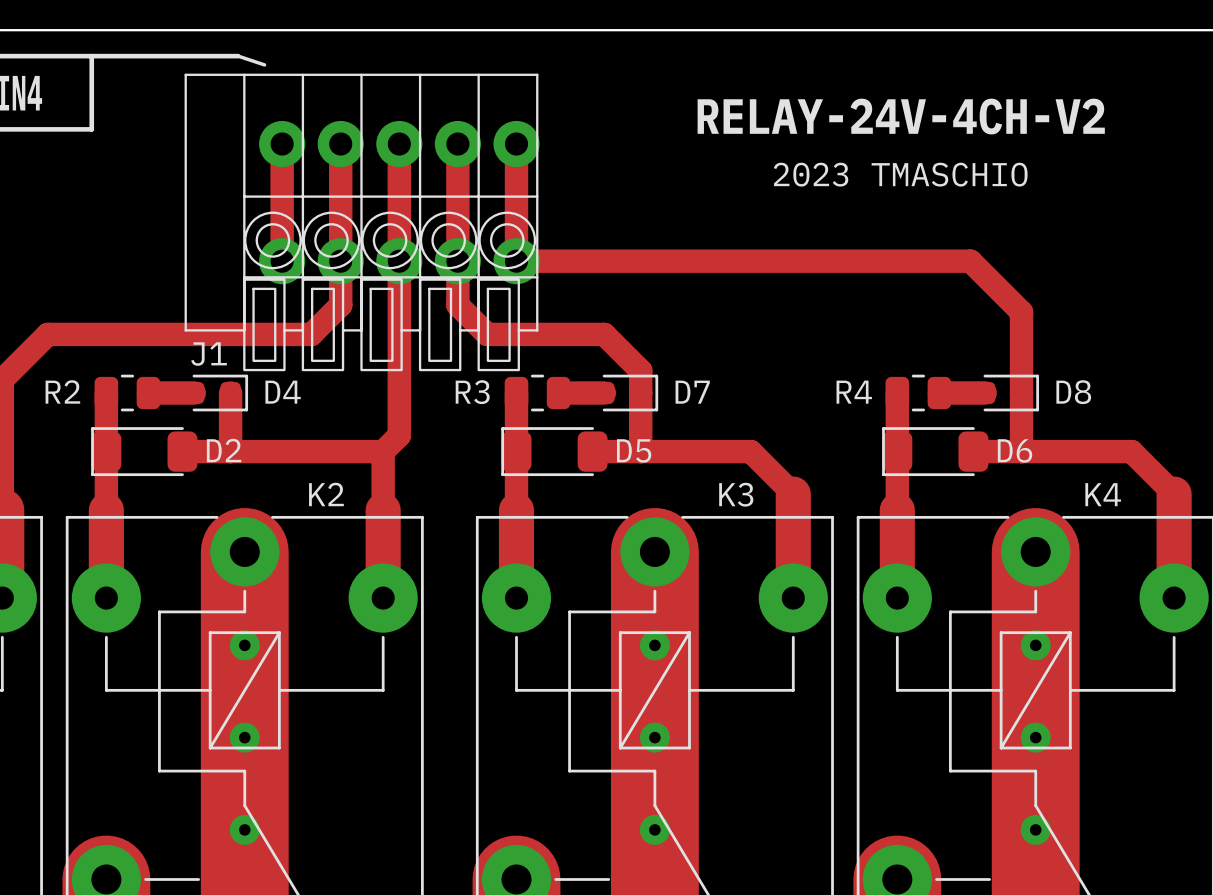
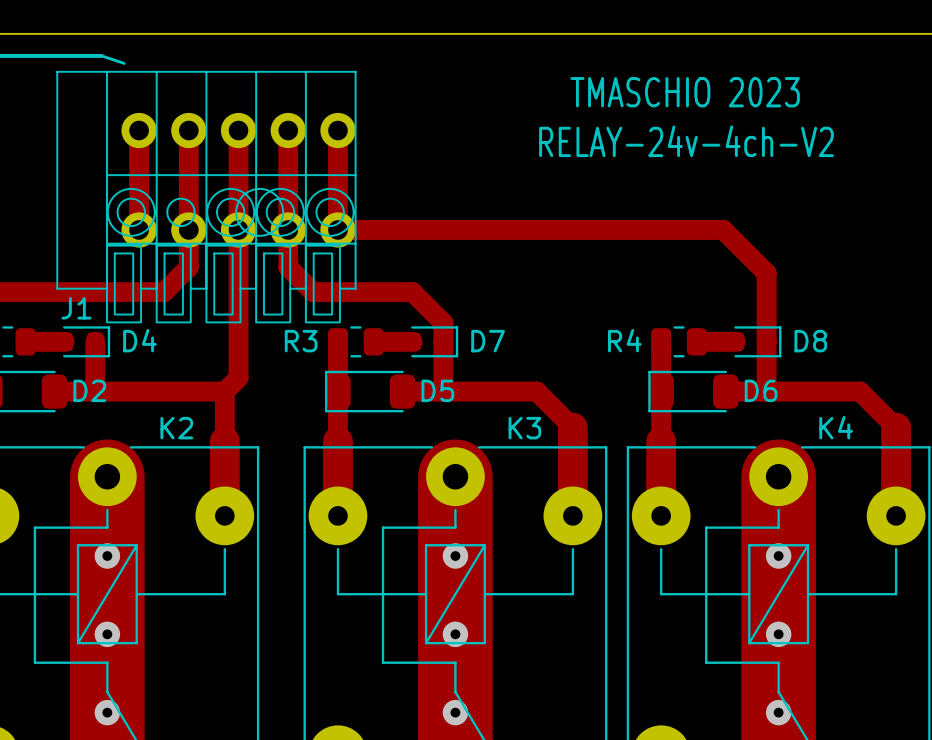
J1 footprint: [184, 73, 540, 372] -> [56, 70, 357, 324]
text: none -> TMASCHIO 2023 (685, 92)
text: RELAY-24V-4CH-V2 (901, 116) -> RELAY-24v-4ch-V2 (686, 141)
text: 2023 TMASCHIO (900, 174) -> none

